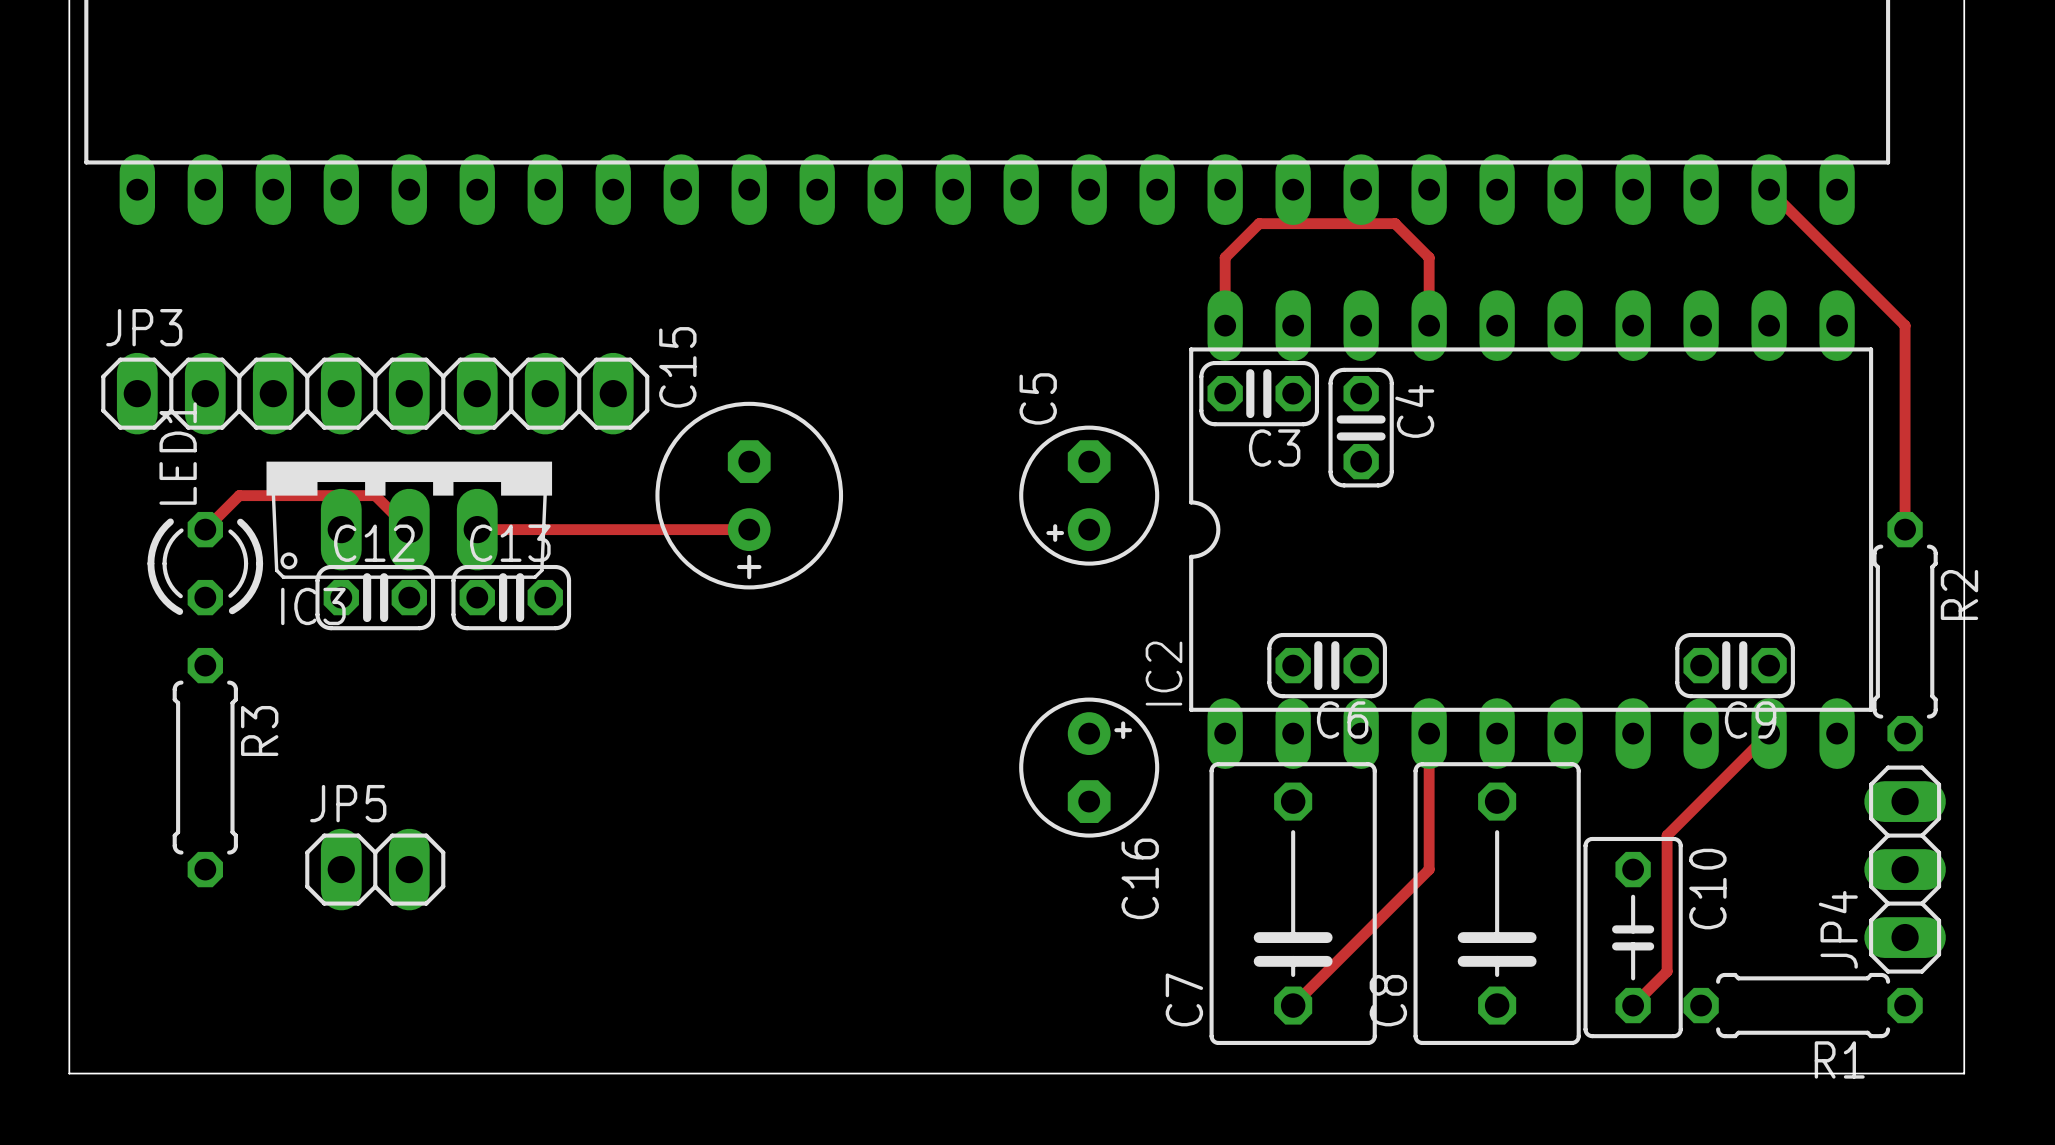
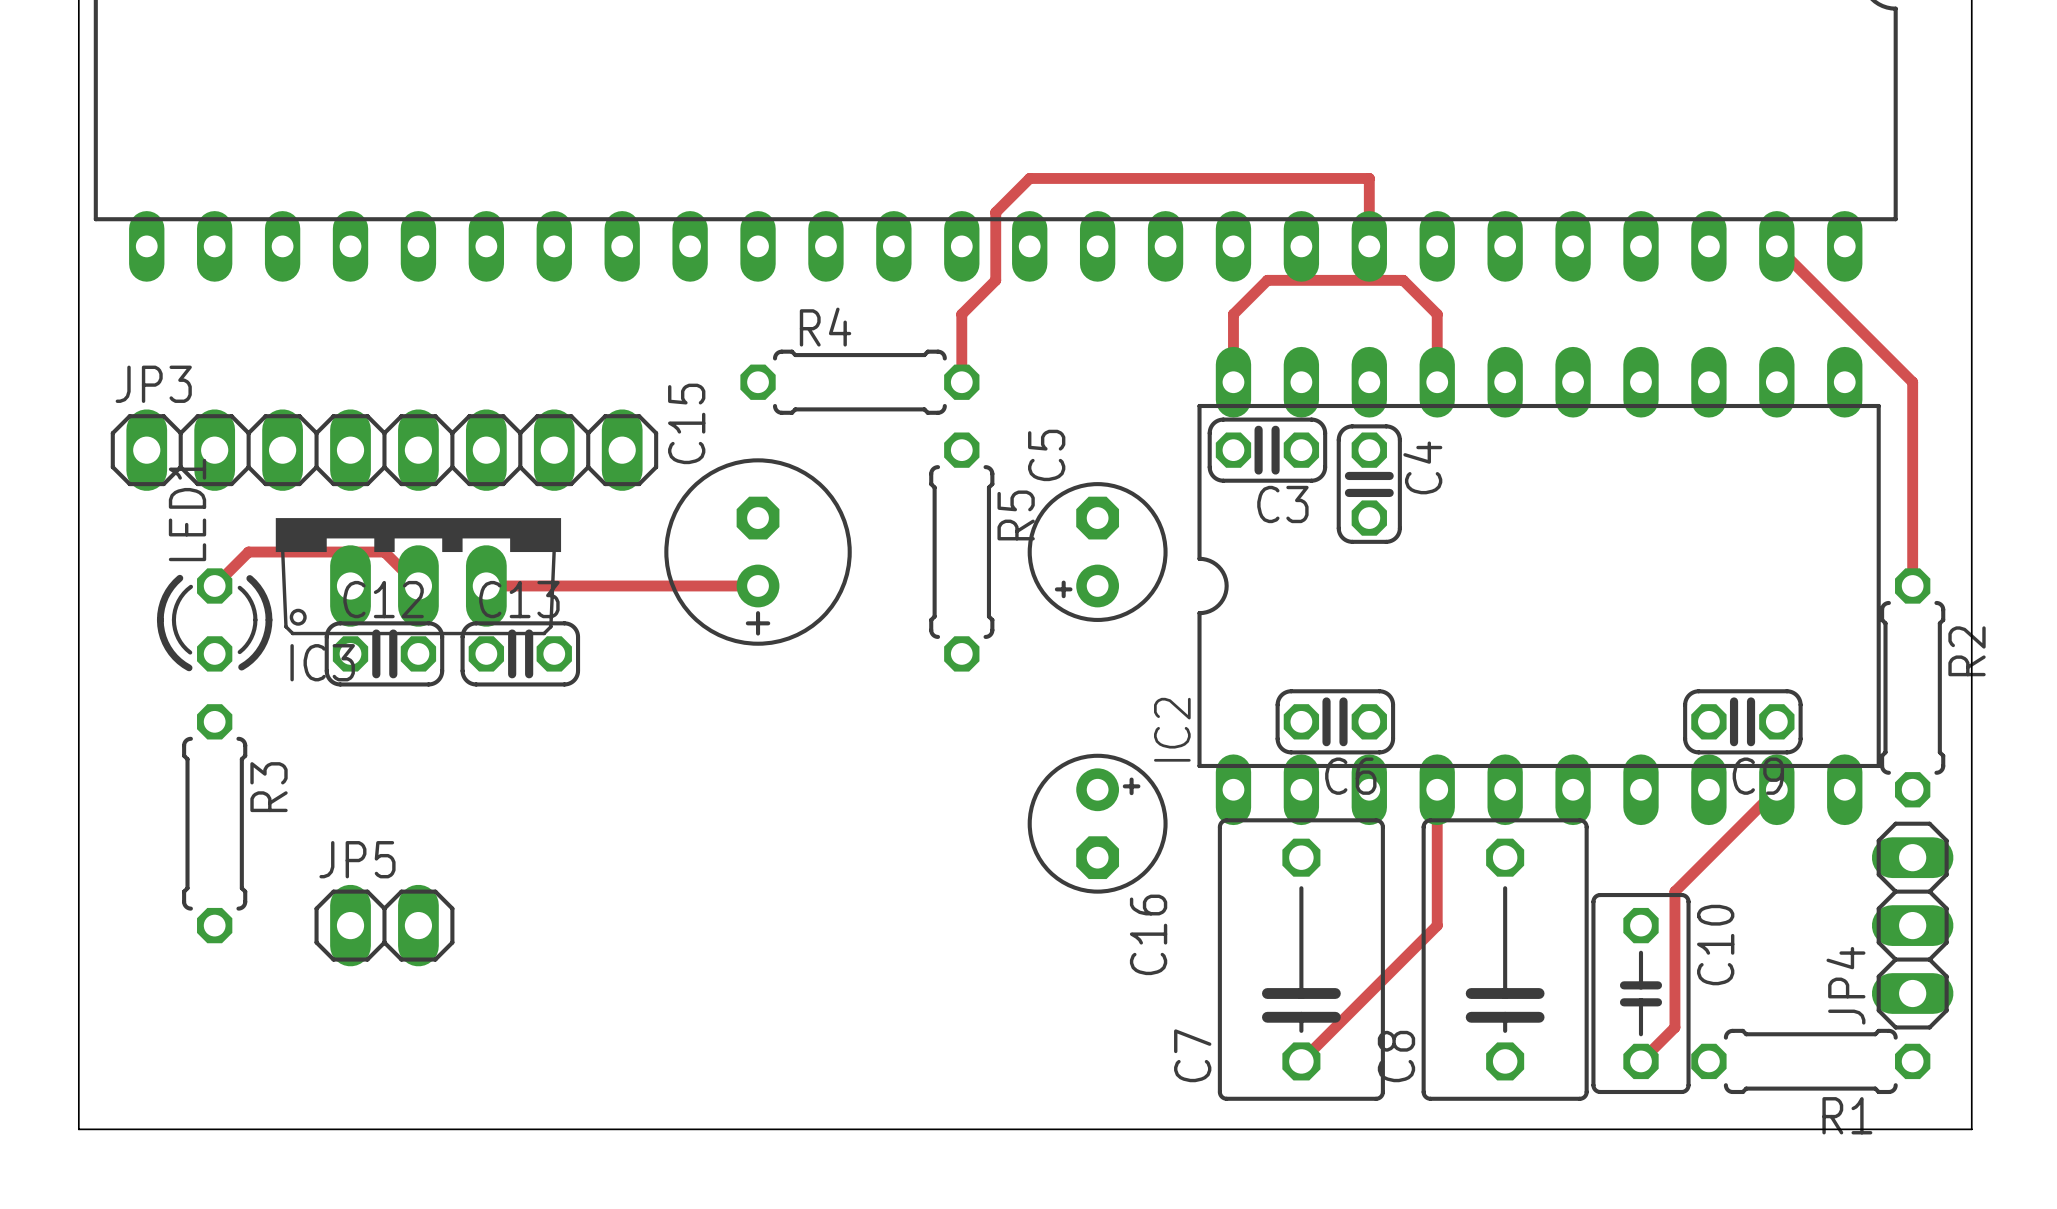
track: none -> (1369, 246) (1369, 178) (1029, 178) (995, 212) (995, 280) (961, 314) (961, 382)
R4: none -> (859, 382)
R5: none -> (961, 552)

